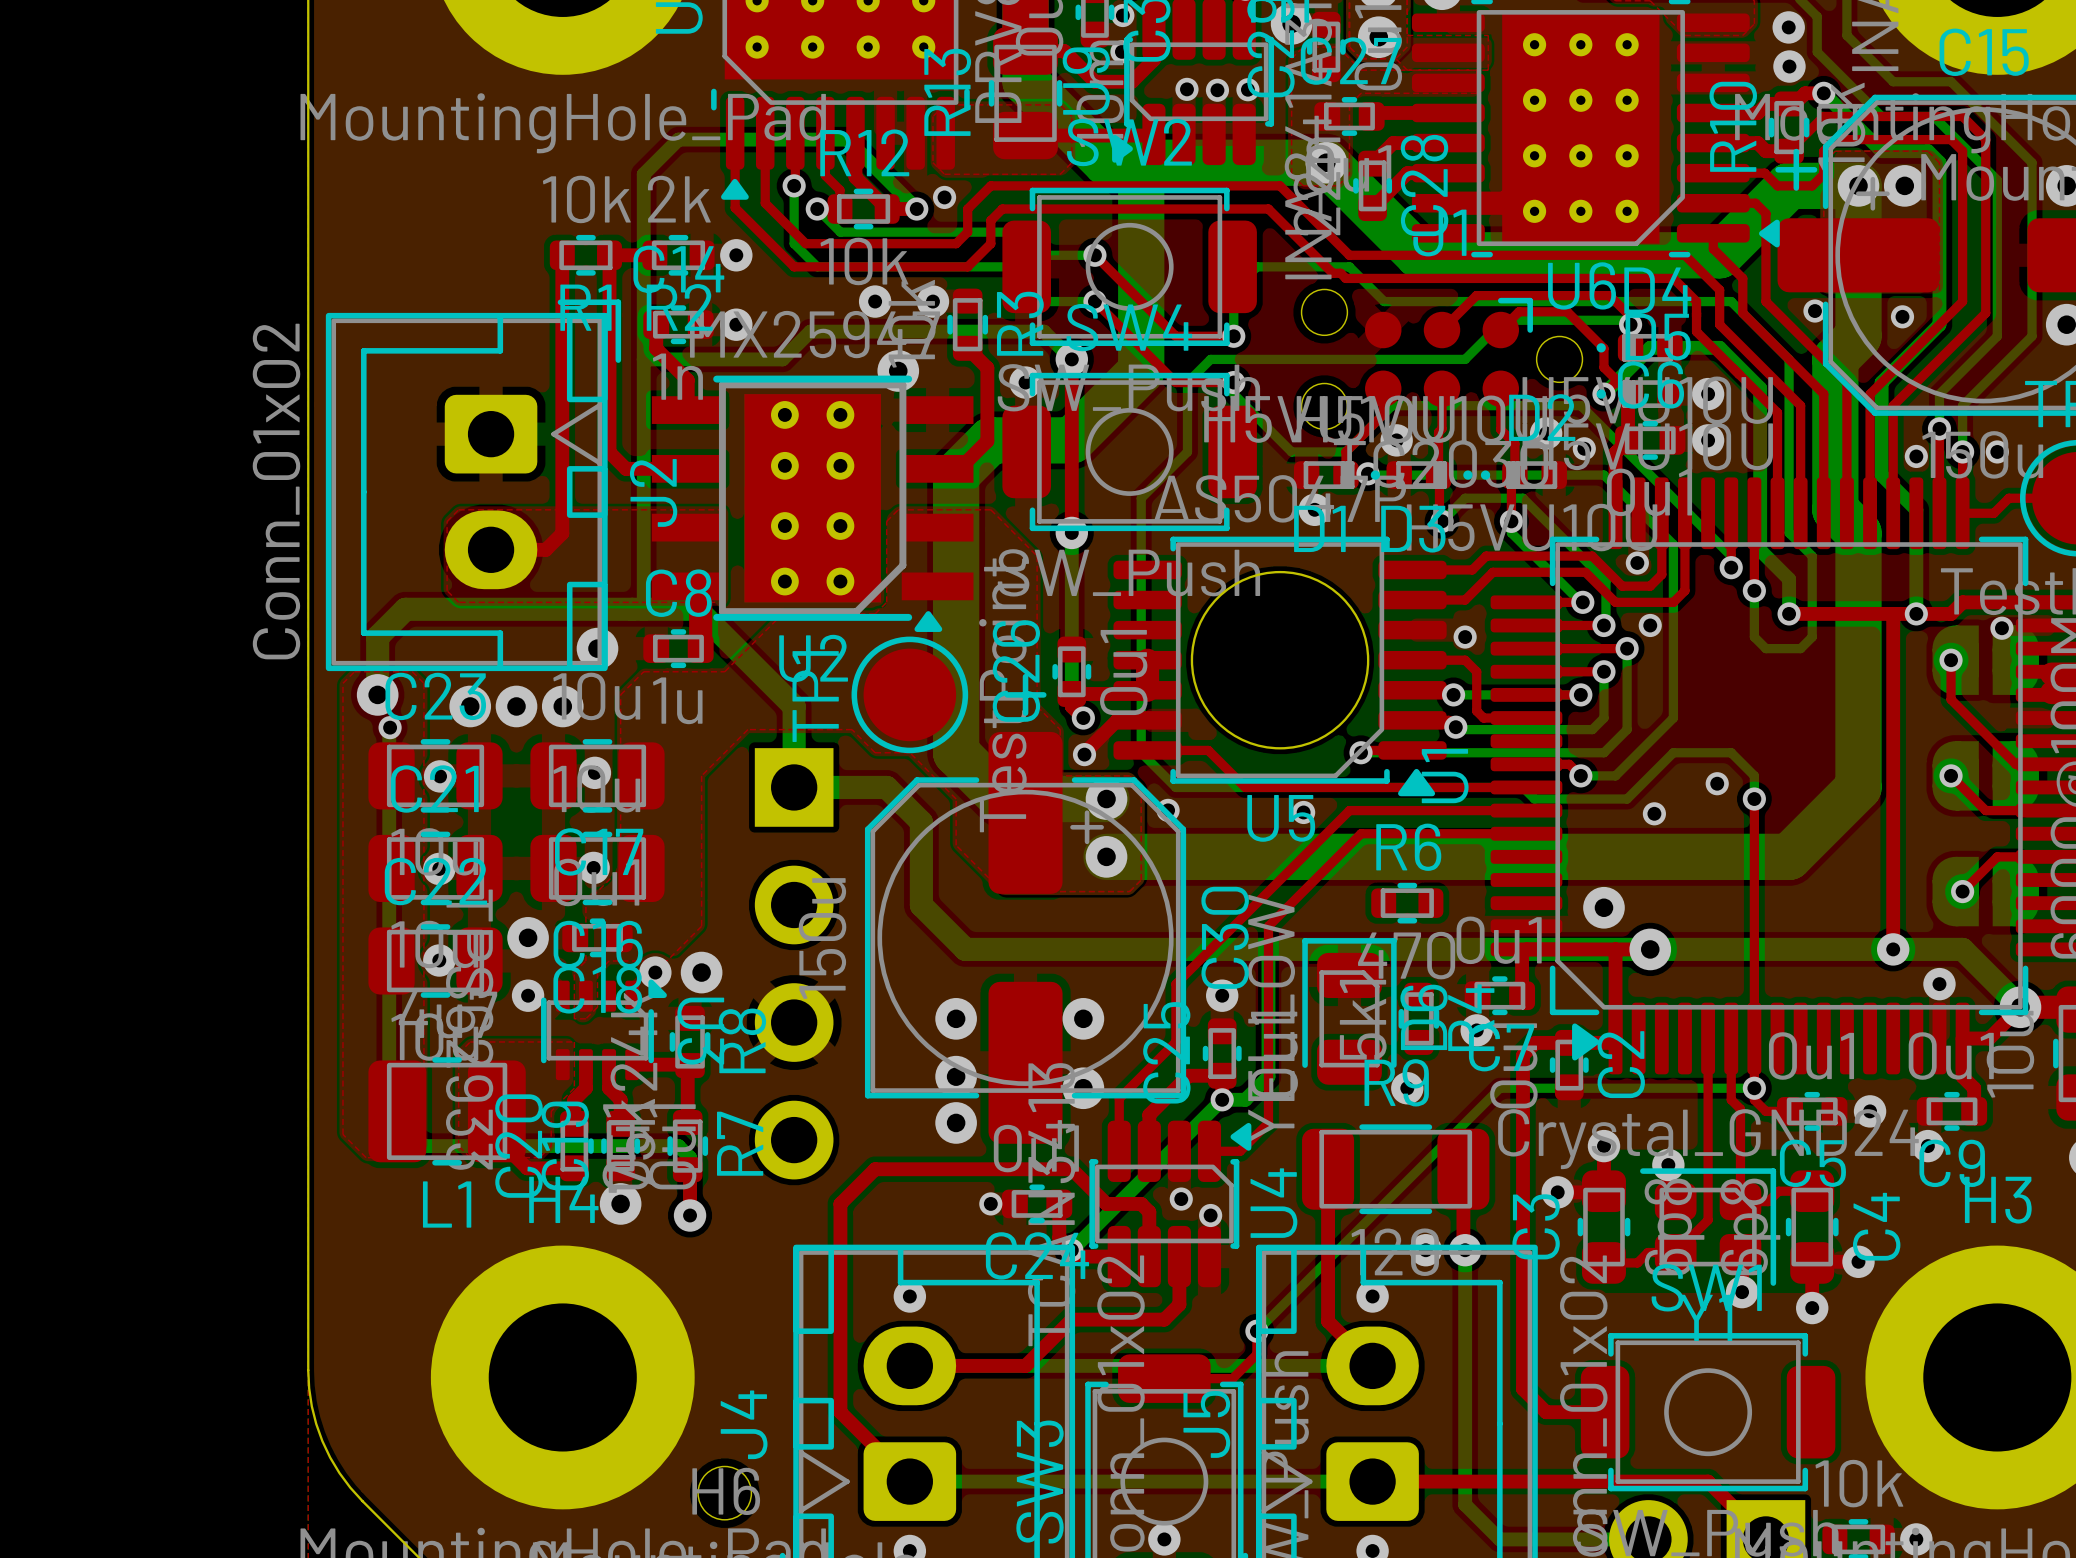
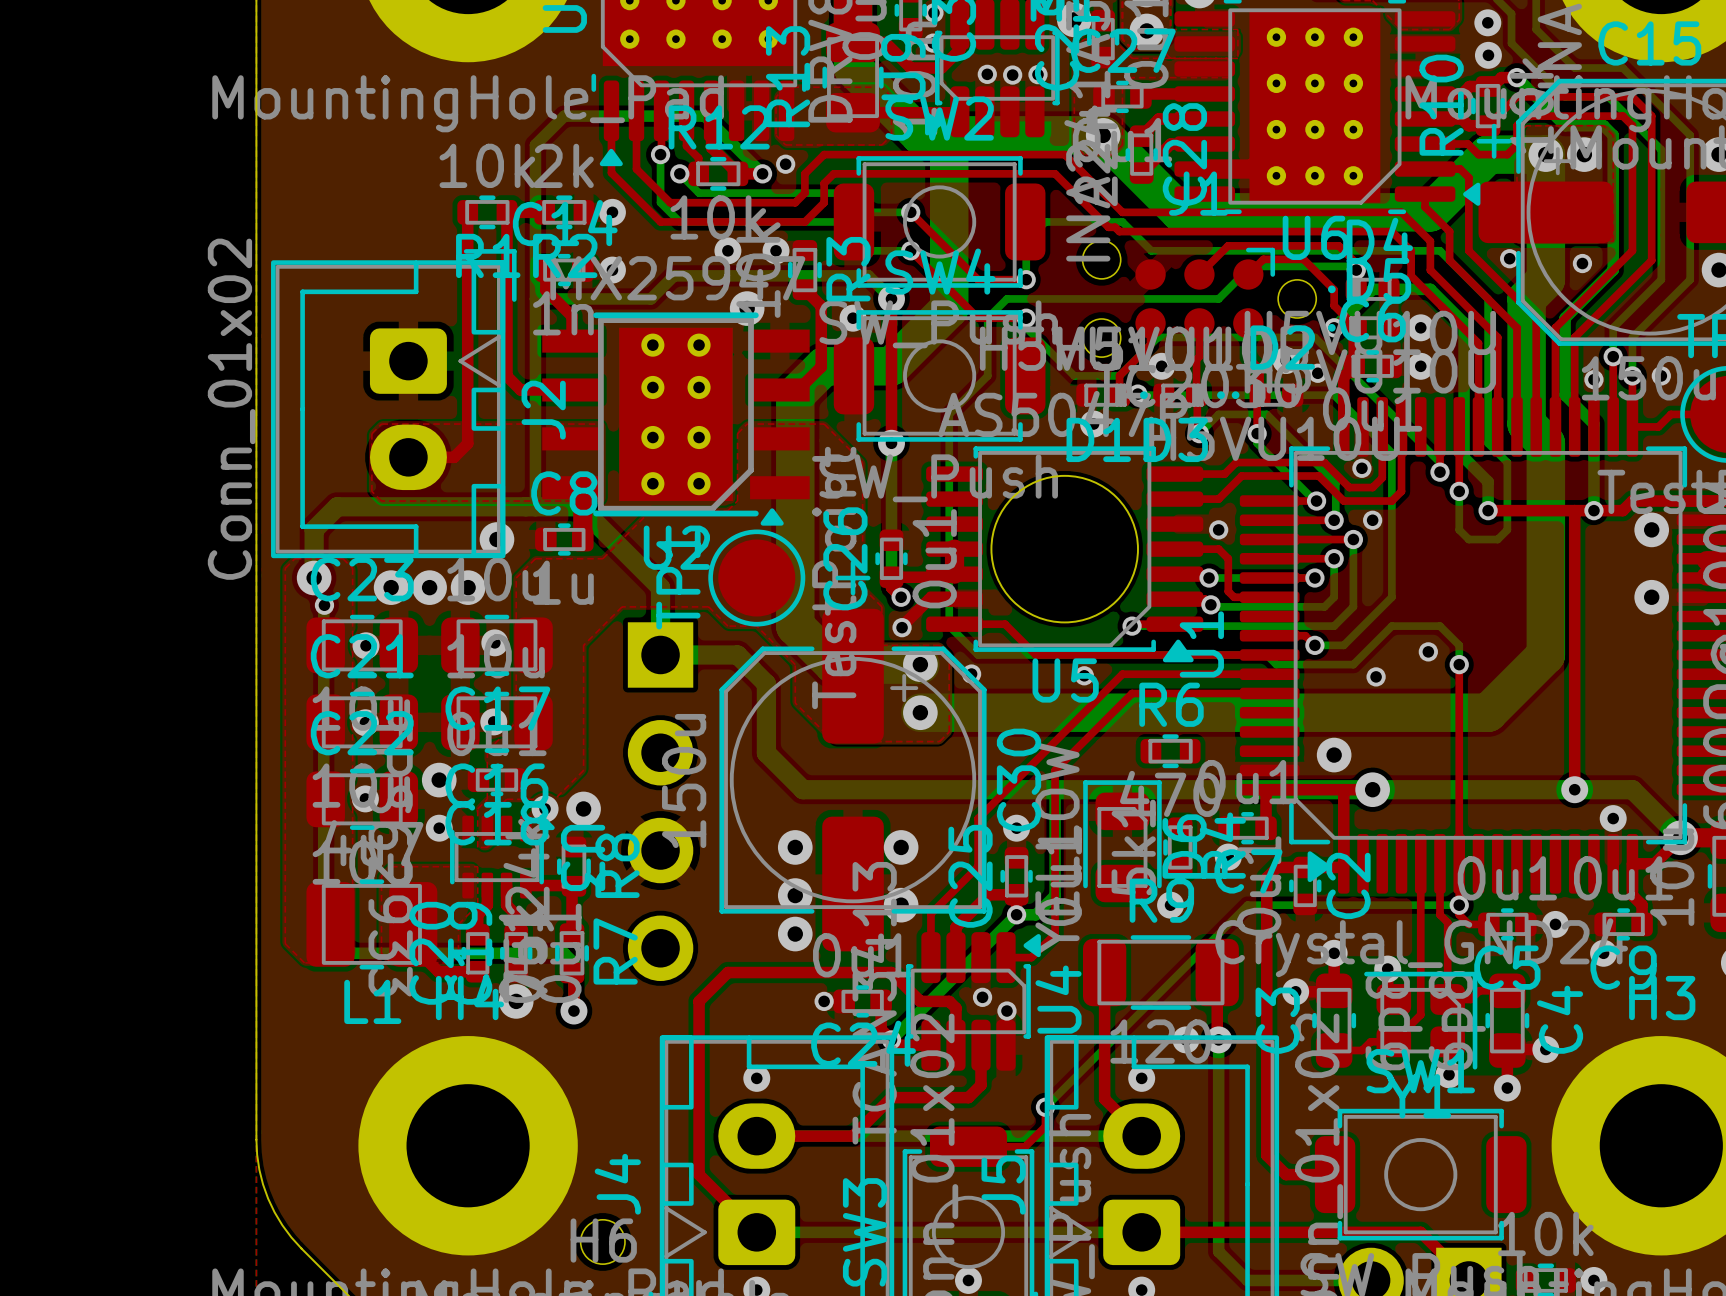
via size: [1990, 616, 2014, 640] -> [1634, 512, 1670, 548]
top track: (1951, 660) (1951, 699) (2015, 764) (2051, 764) -> none
via: (1951, 660) -> none
part: (1985, 660) -> none
via: none -> (1651, 597)
top track: (1951, 775) (1985, 810) (2051, 810) -> none
via: (1951, 775) -> none
part: (1985, 775) -> none
top track: (2051, 856) (1997, 856) (1962, 891) -> none
via: (1962, 891) -> none
part: (1985, 891) -> none

